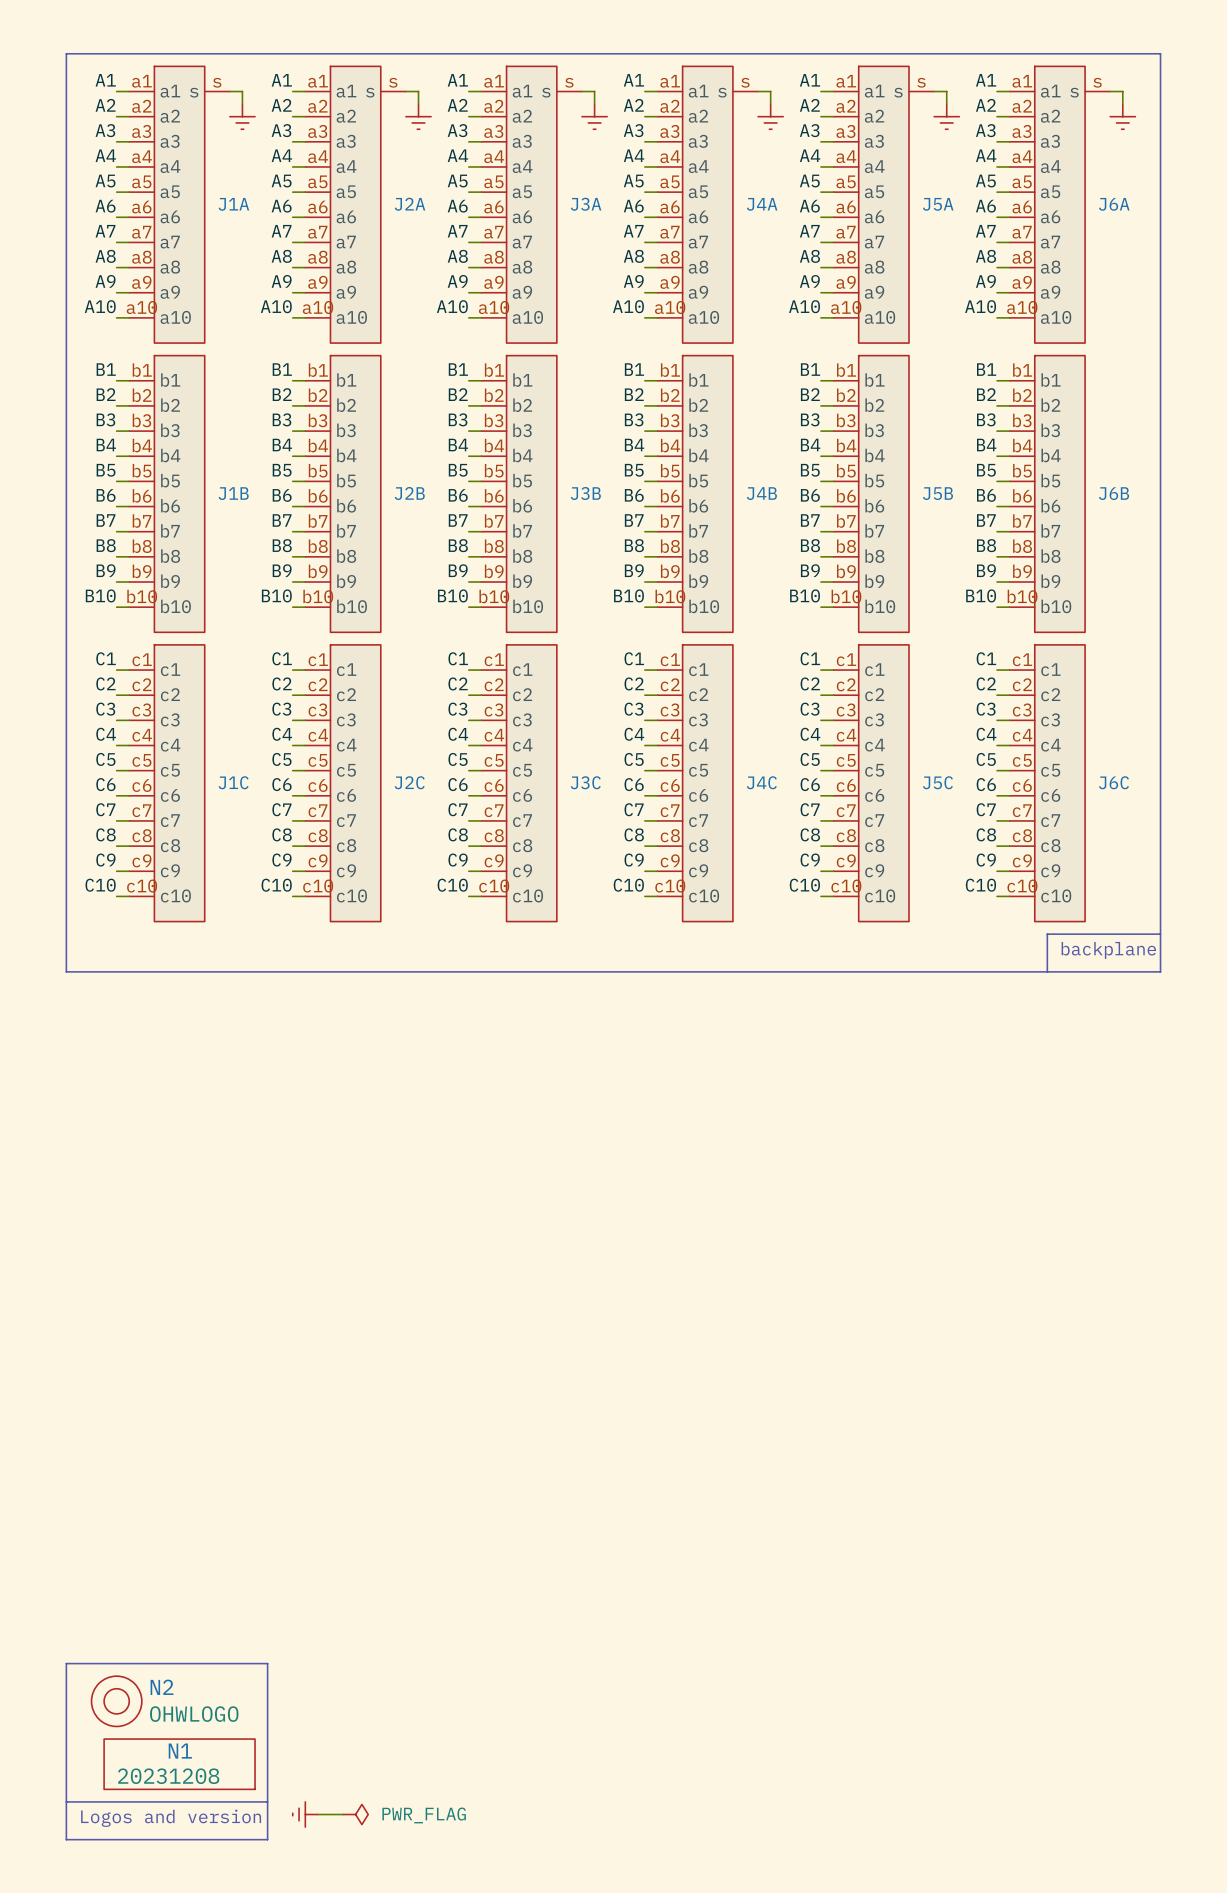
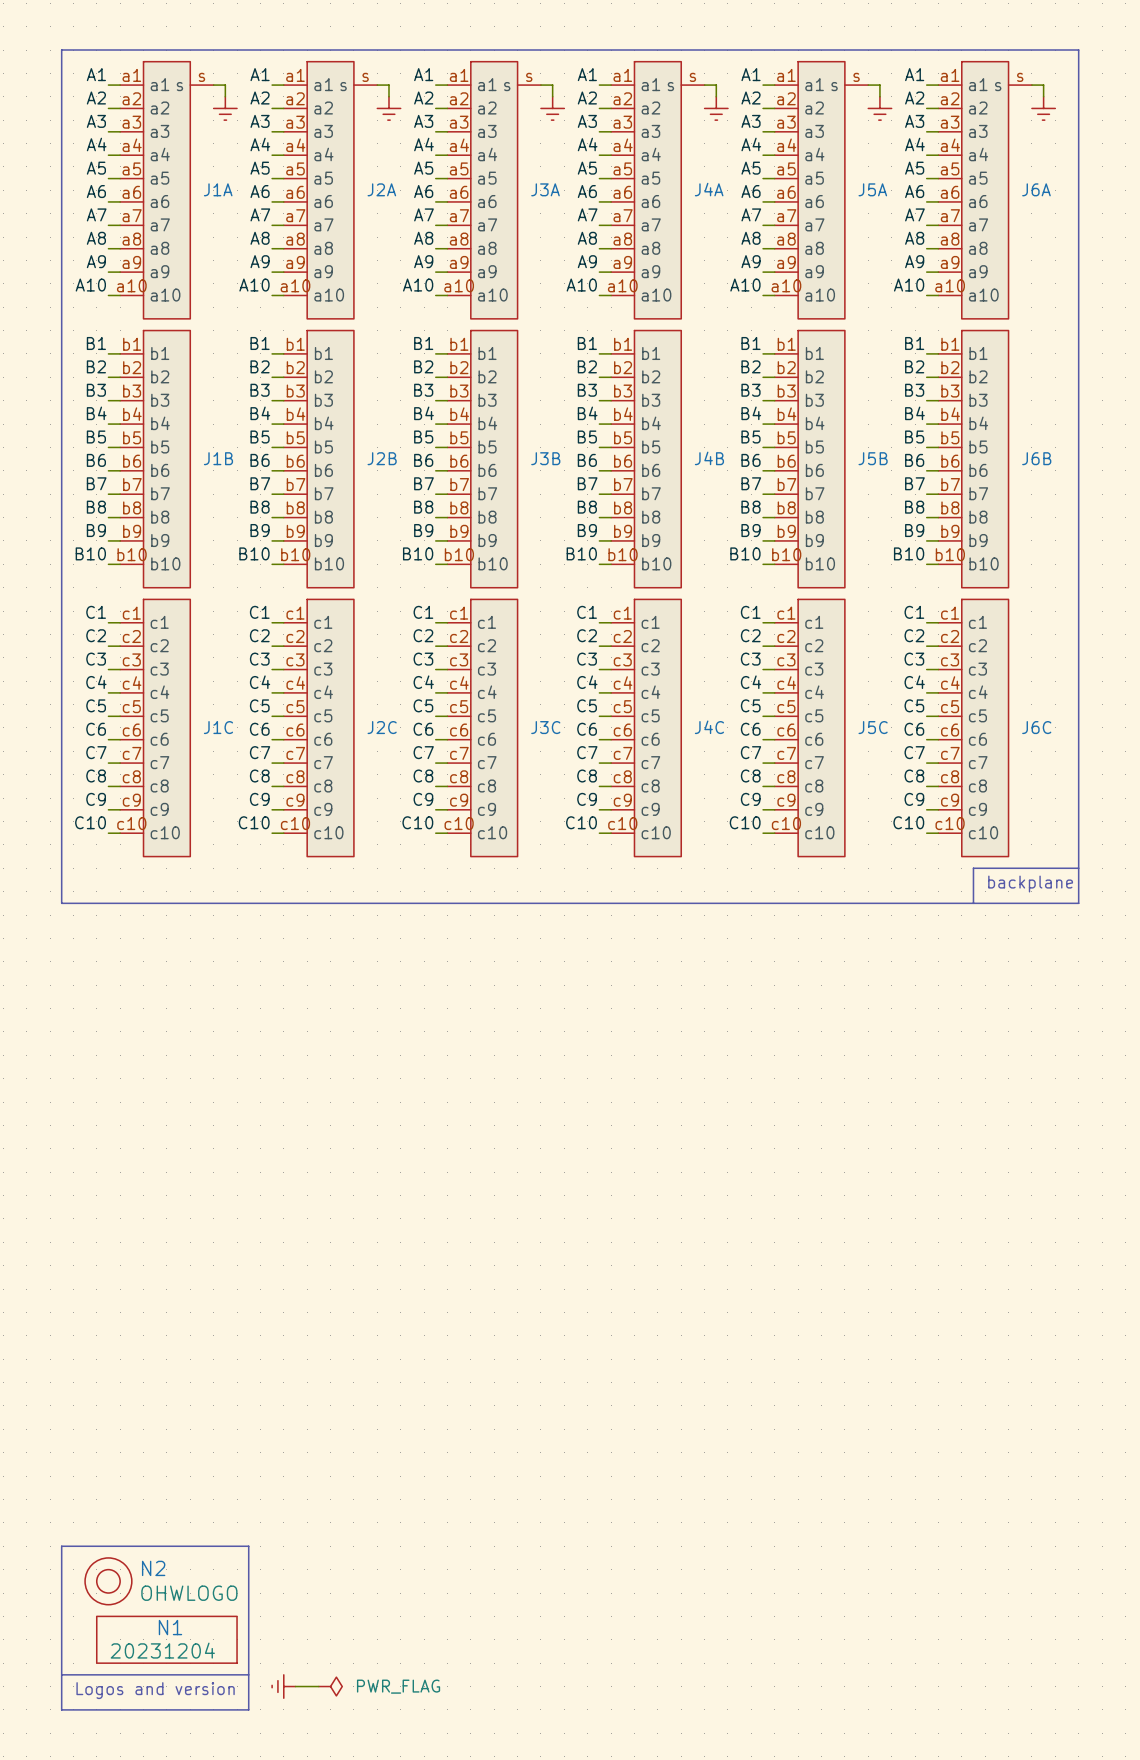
N1 value: 20231208 (168, 1776) -> 20231204 (162, 1650)

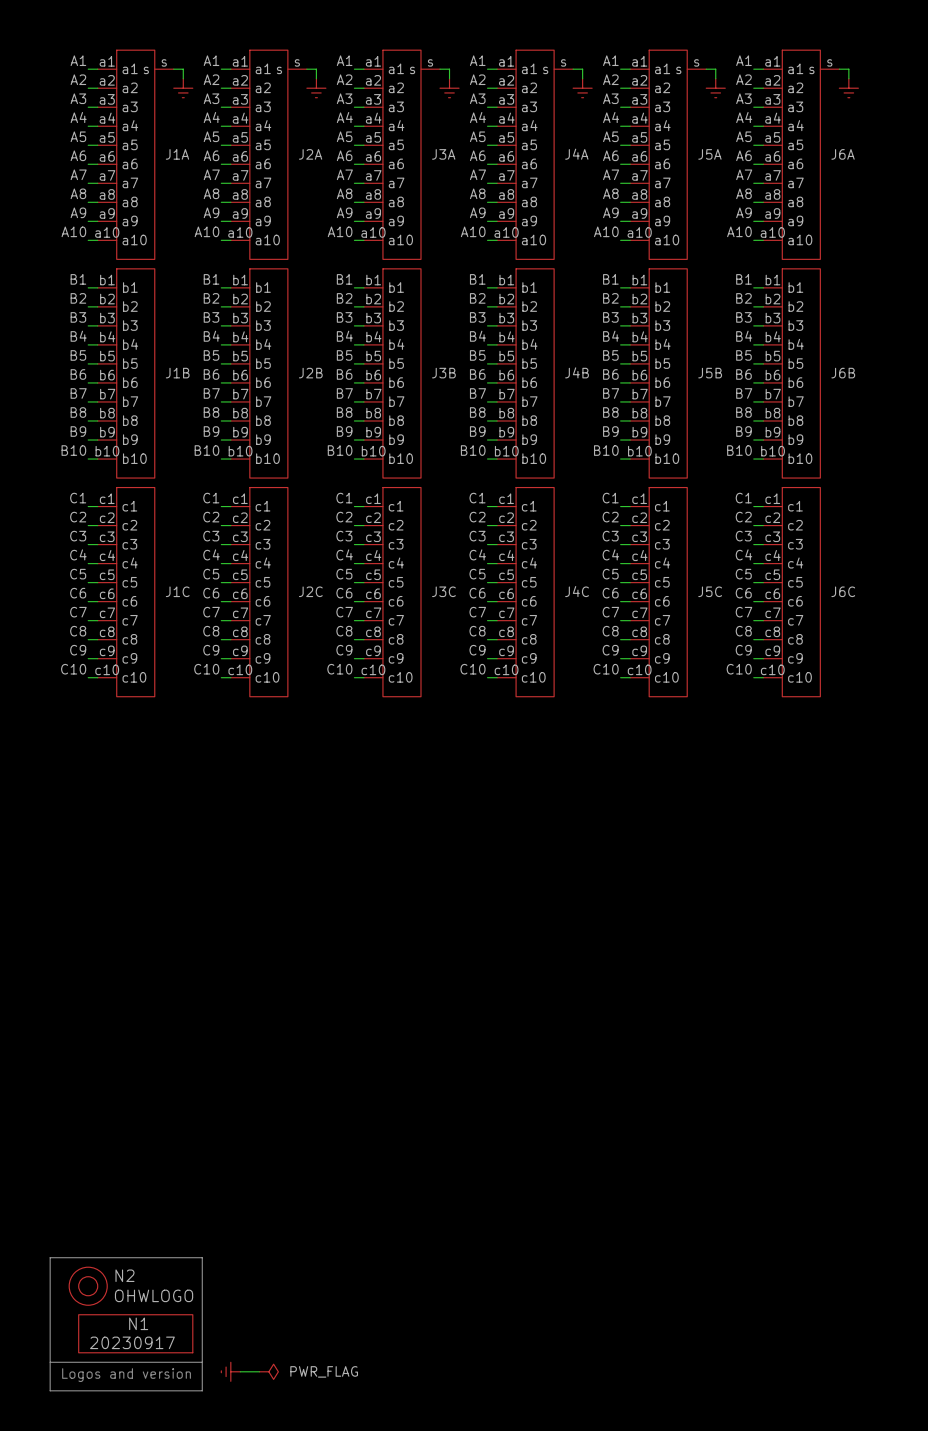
line: (61, 50) (1078, 50) (1078, 903) (61, 903) (61, 50) -> none
line: (1078, 868) (973, 868) (973, 903) -> none
text: backplane (1030, 884) -> none
N1 value: 20231204 (162, 1650) -> 20230917 (132, 1342)

